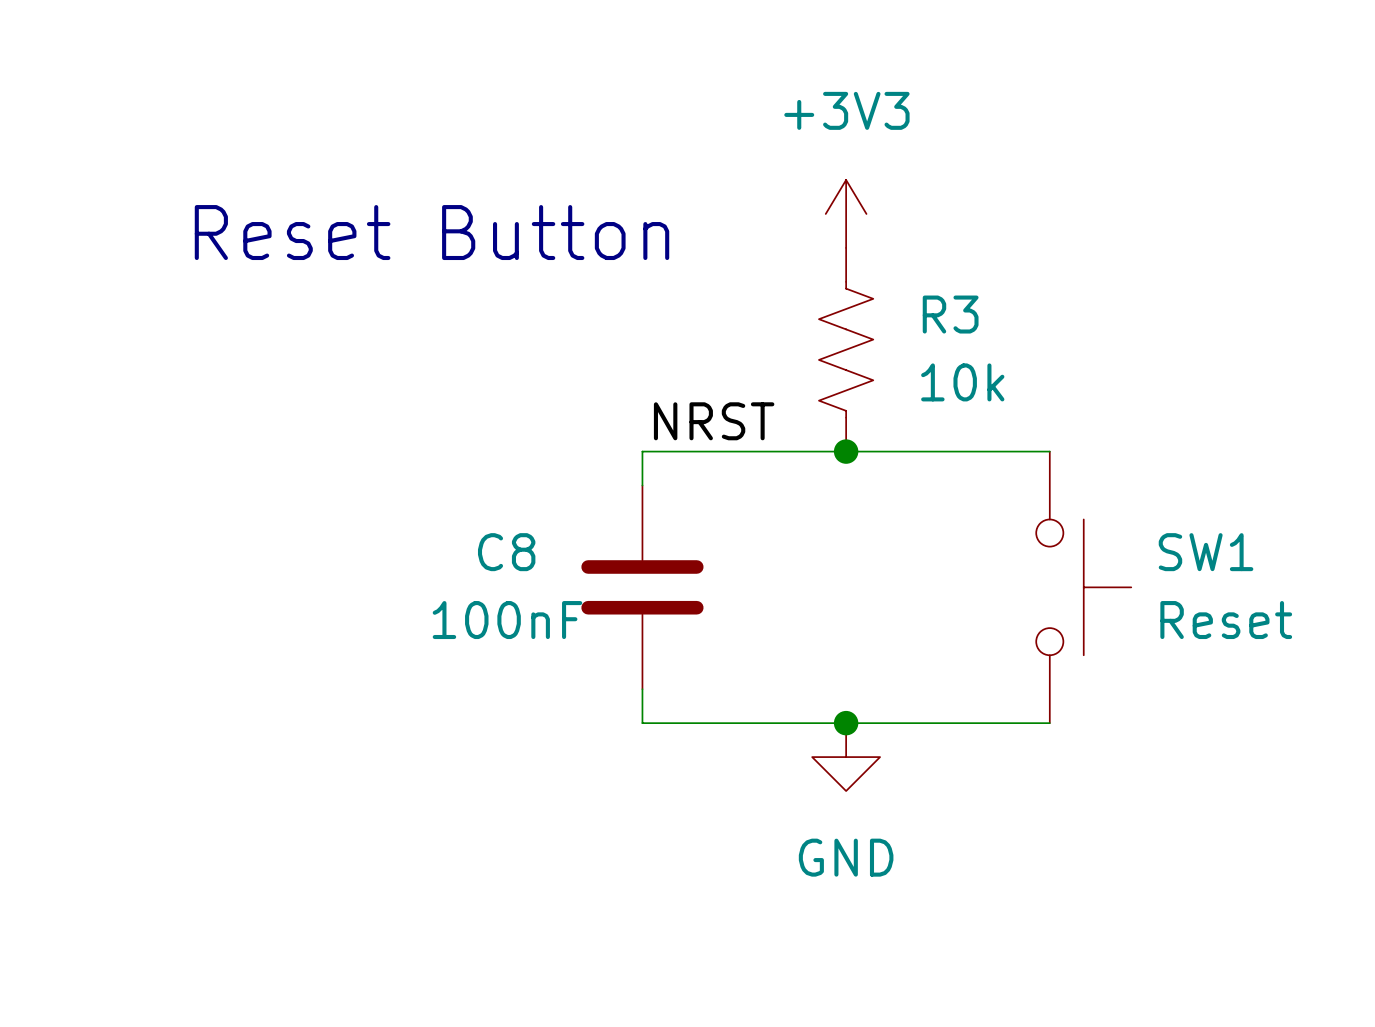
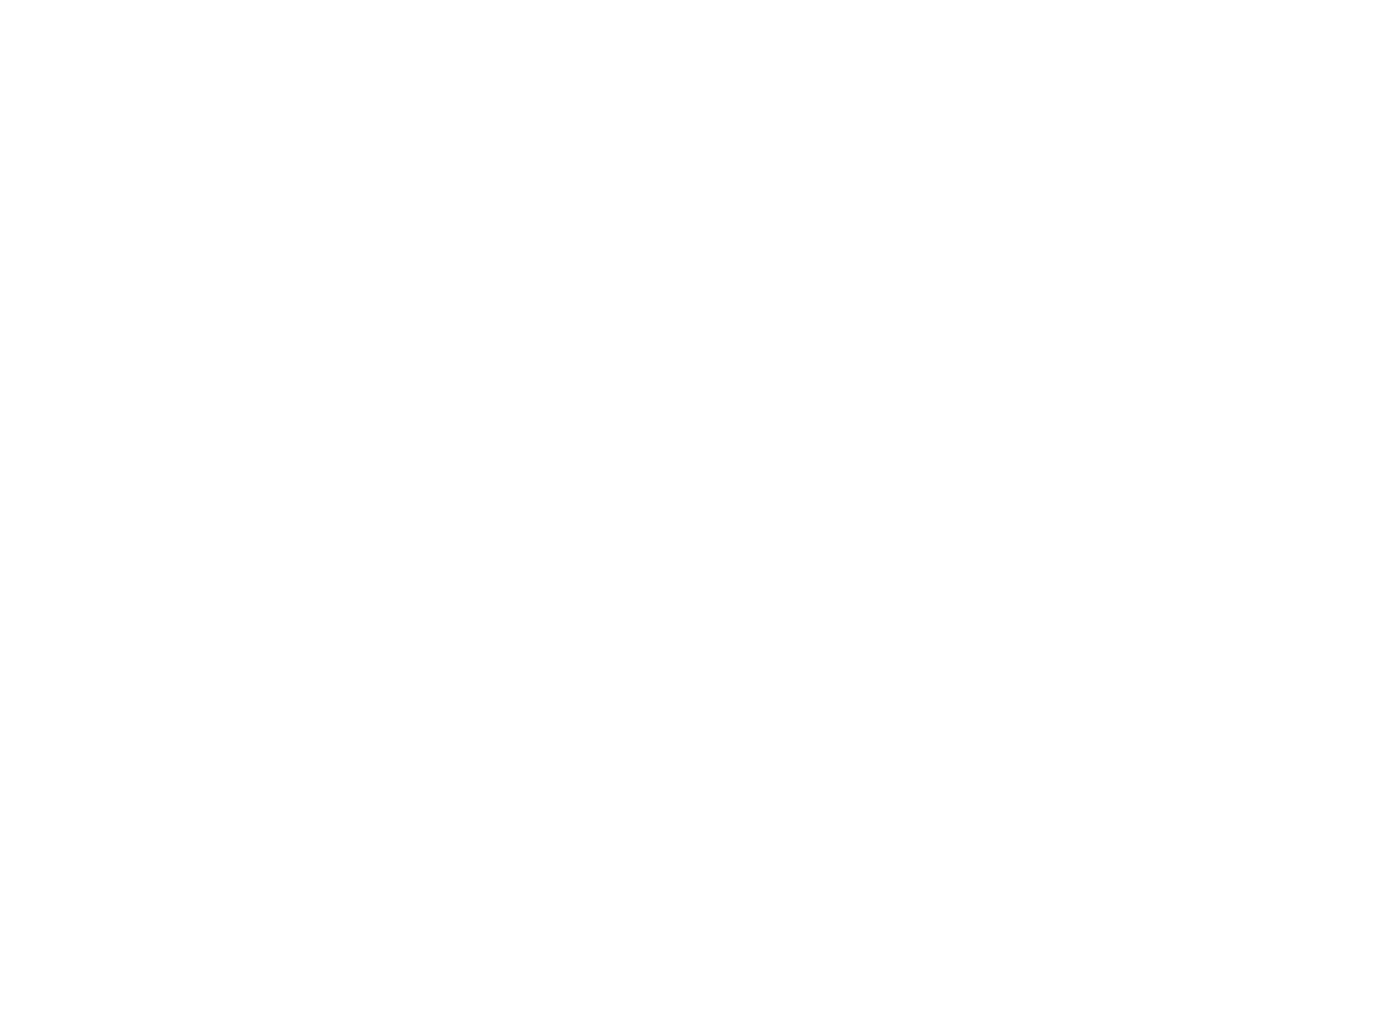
power symbol: +3V3 (846, 213) -> none
text: Reset Button (432, 232) -> none
R3: 10k (846, 349) -> none
label: NRST (714, 421) -> none
junction: (846, 451) -> none
wire: (1049, 451) (642, 451) (642, 485) -> none
C8: 100nF (642, 587) -> none
SW1: Reset (1083, 587) -> none
wire: (642, 689) (642, 723) (1049, 723) -> none
junction: (846, 723) -> none
power symbol: GND (846, 757) -> none

